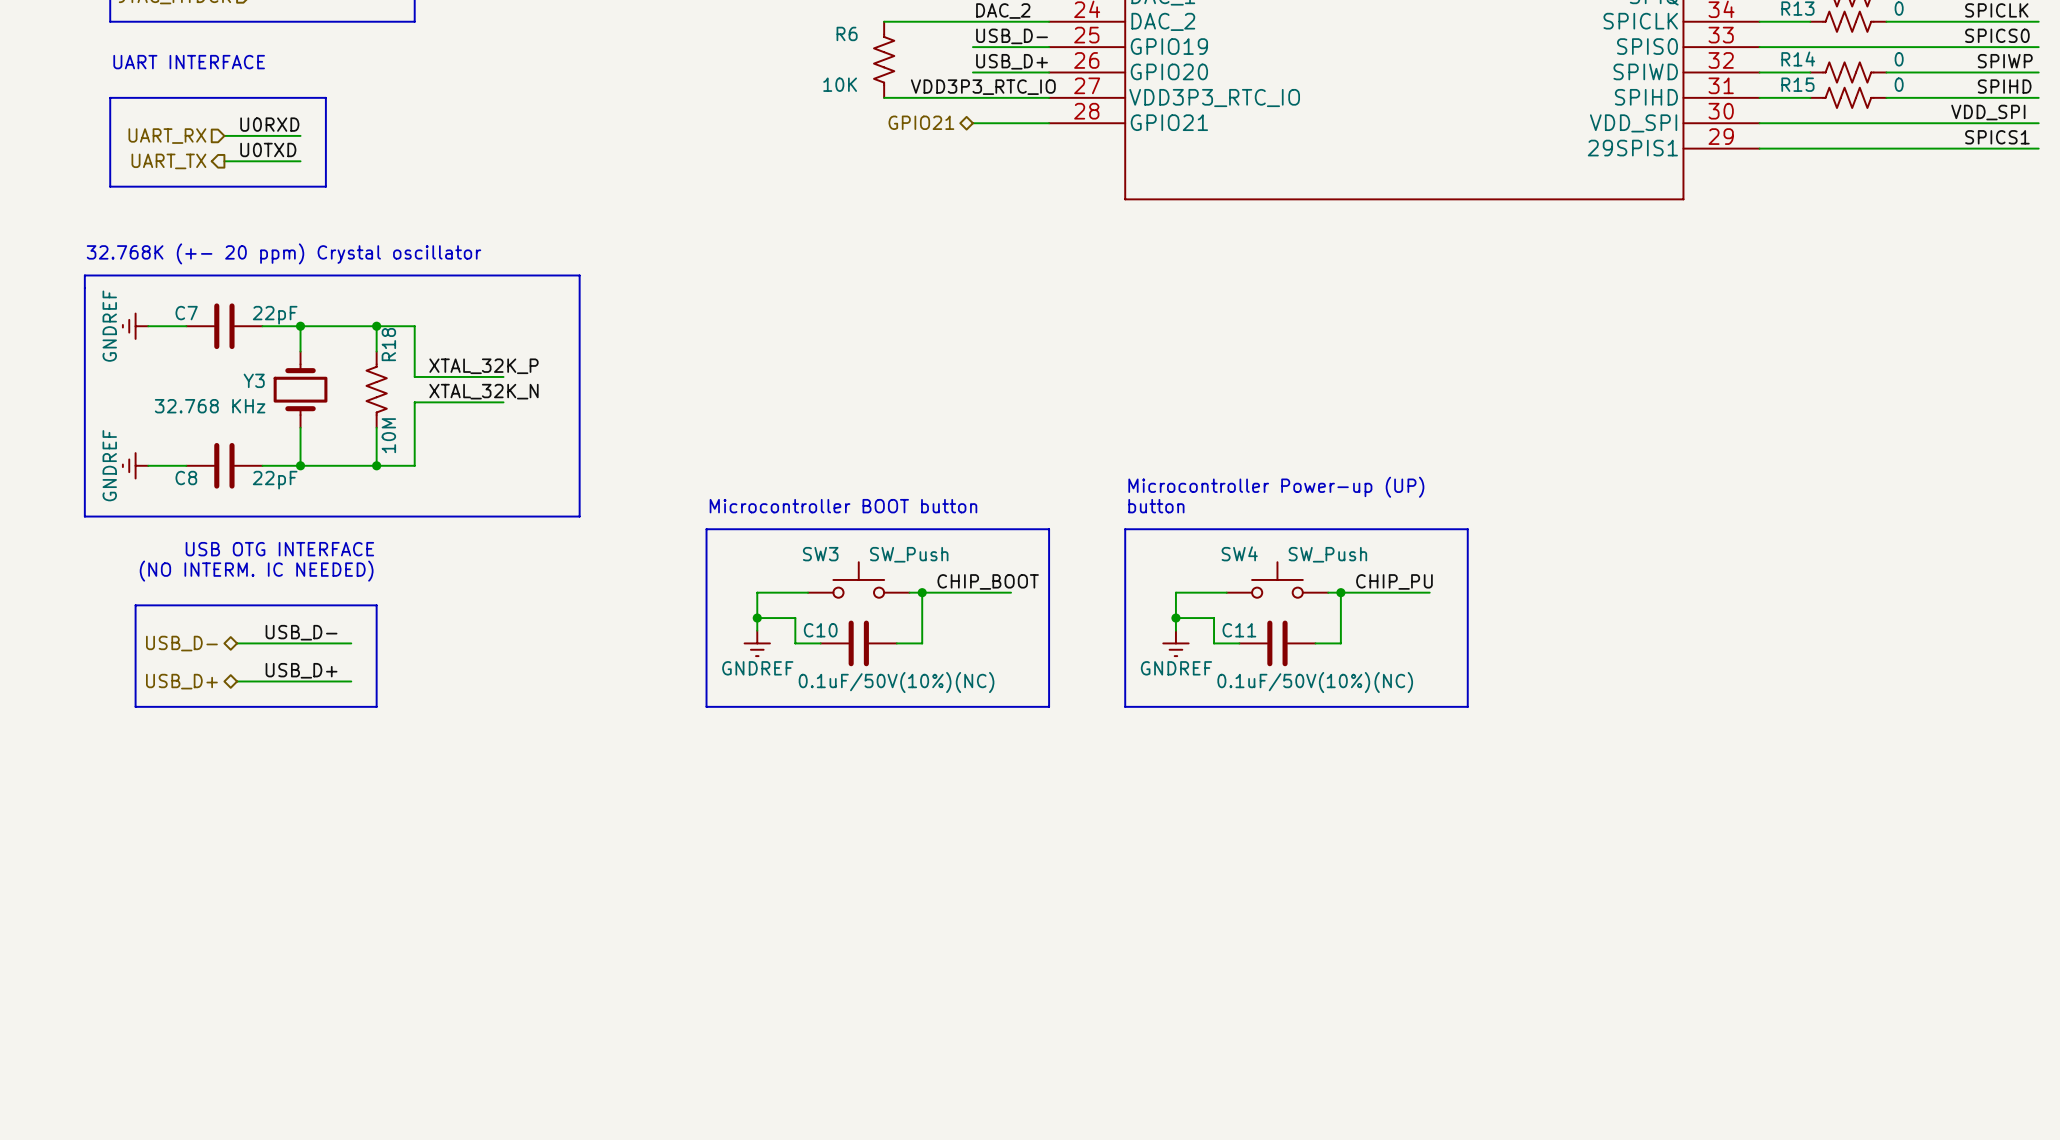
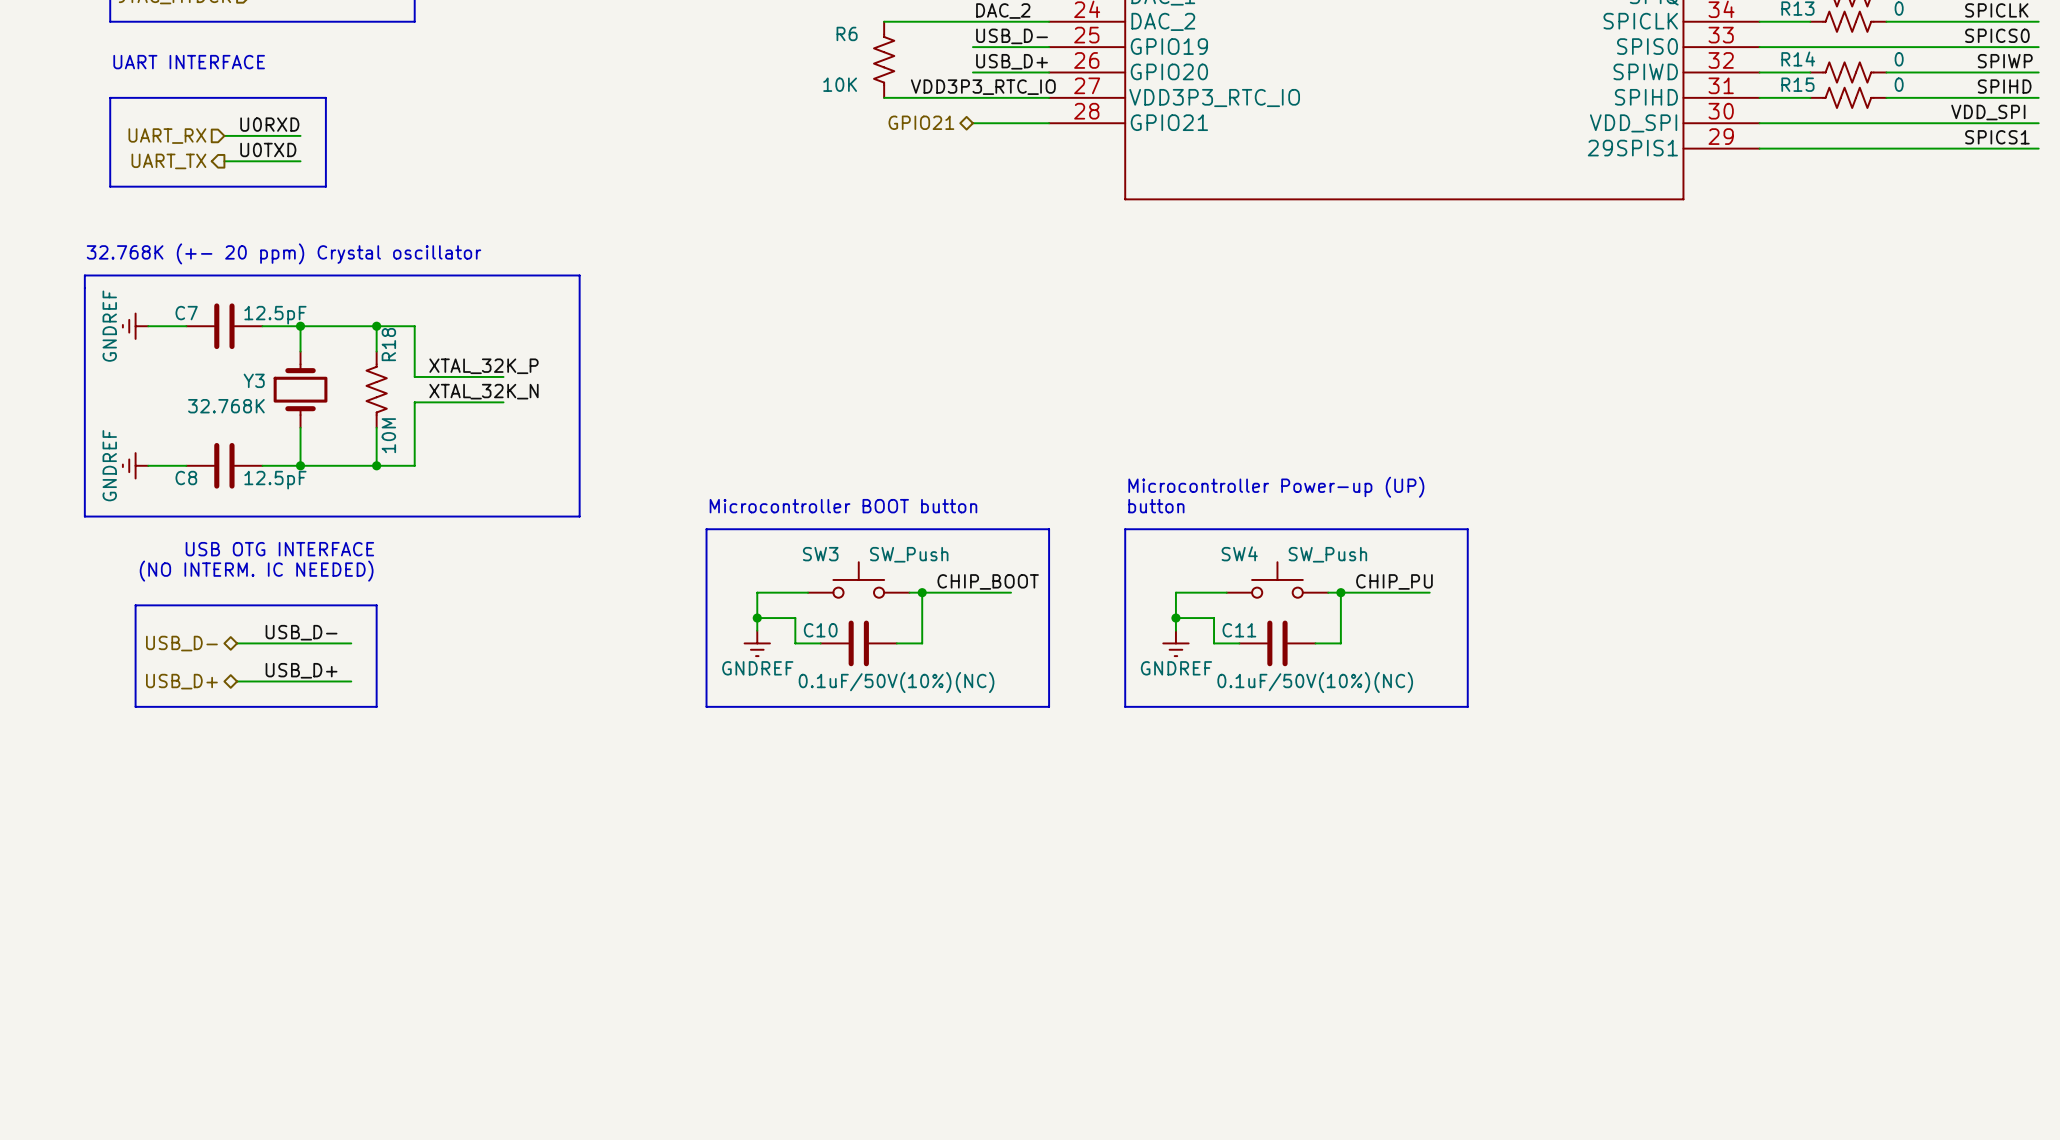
C7 value: 22pF (275, 315) -> 12.5pF (275, 315)
Y3 value: 32.768 KHz (210, 406) -> 32.768K (226, 406)
C8 value: 22pF (275, 480) -> 12.5pF (275, 480)

